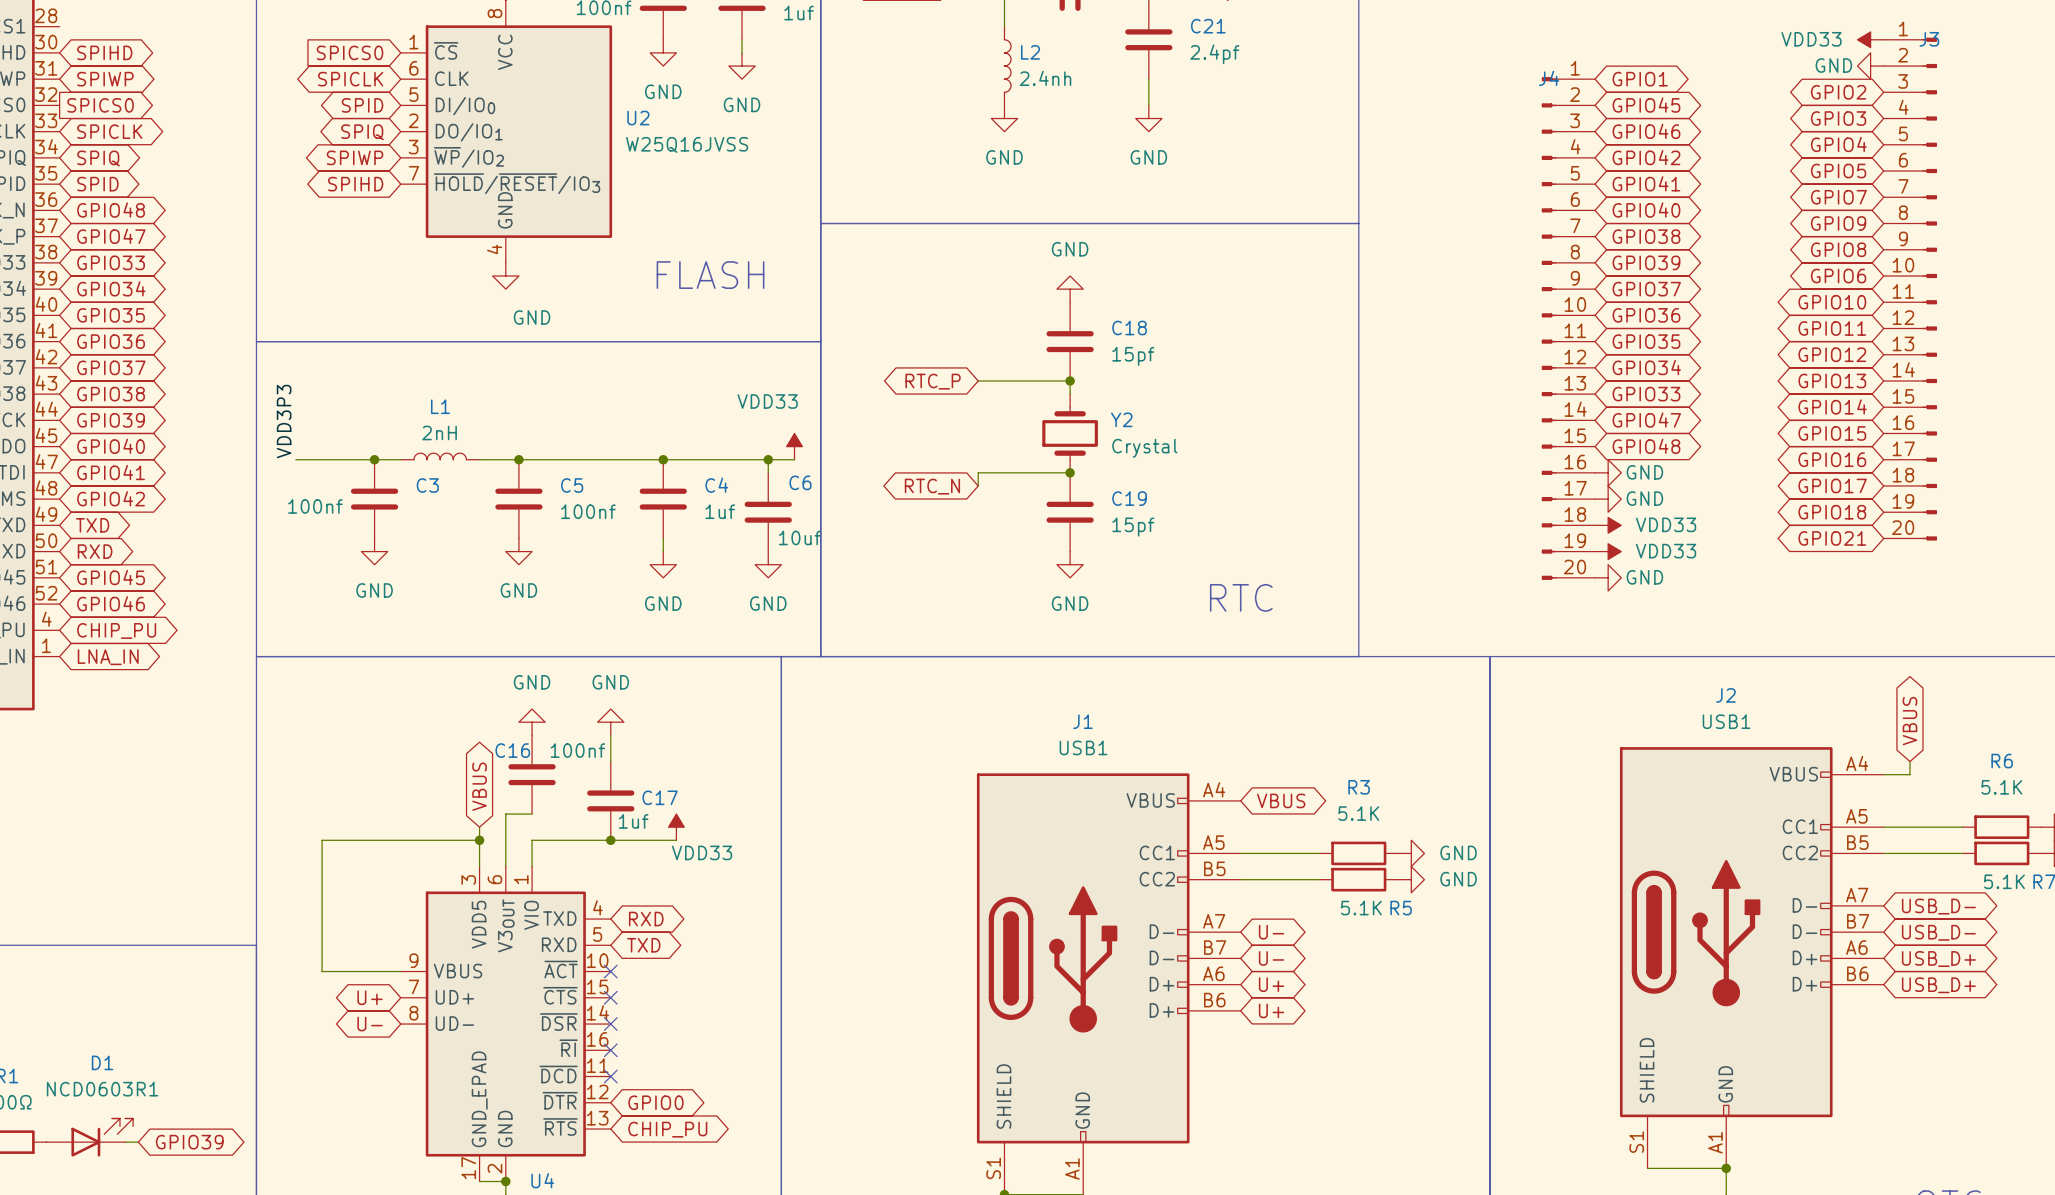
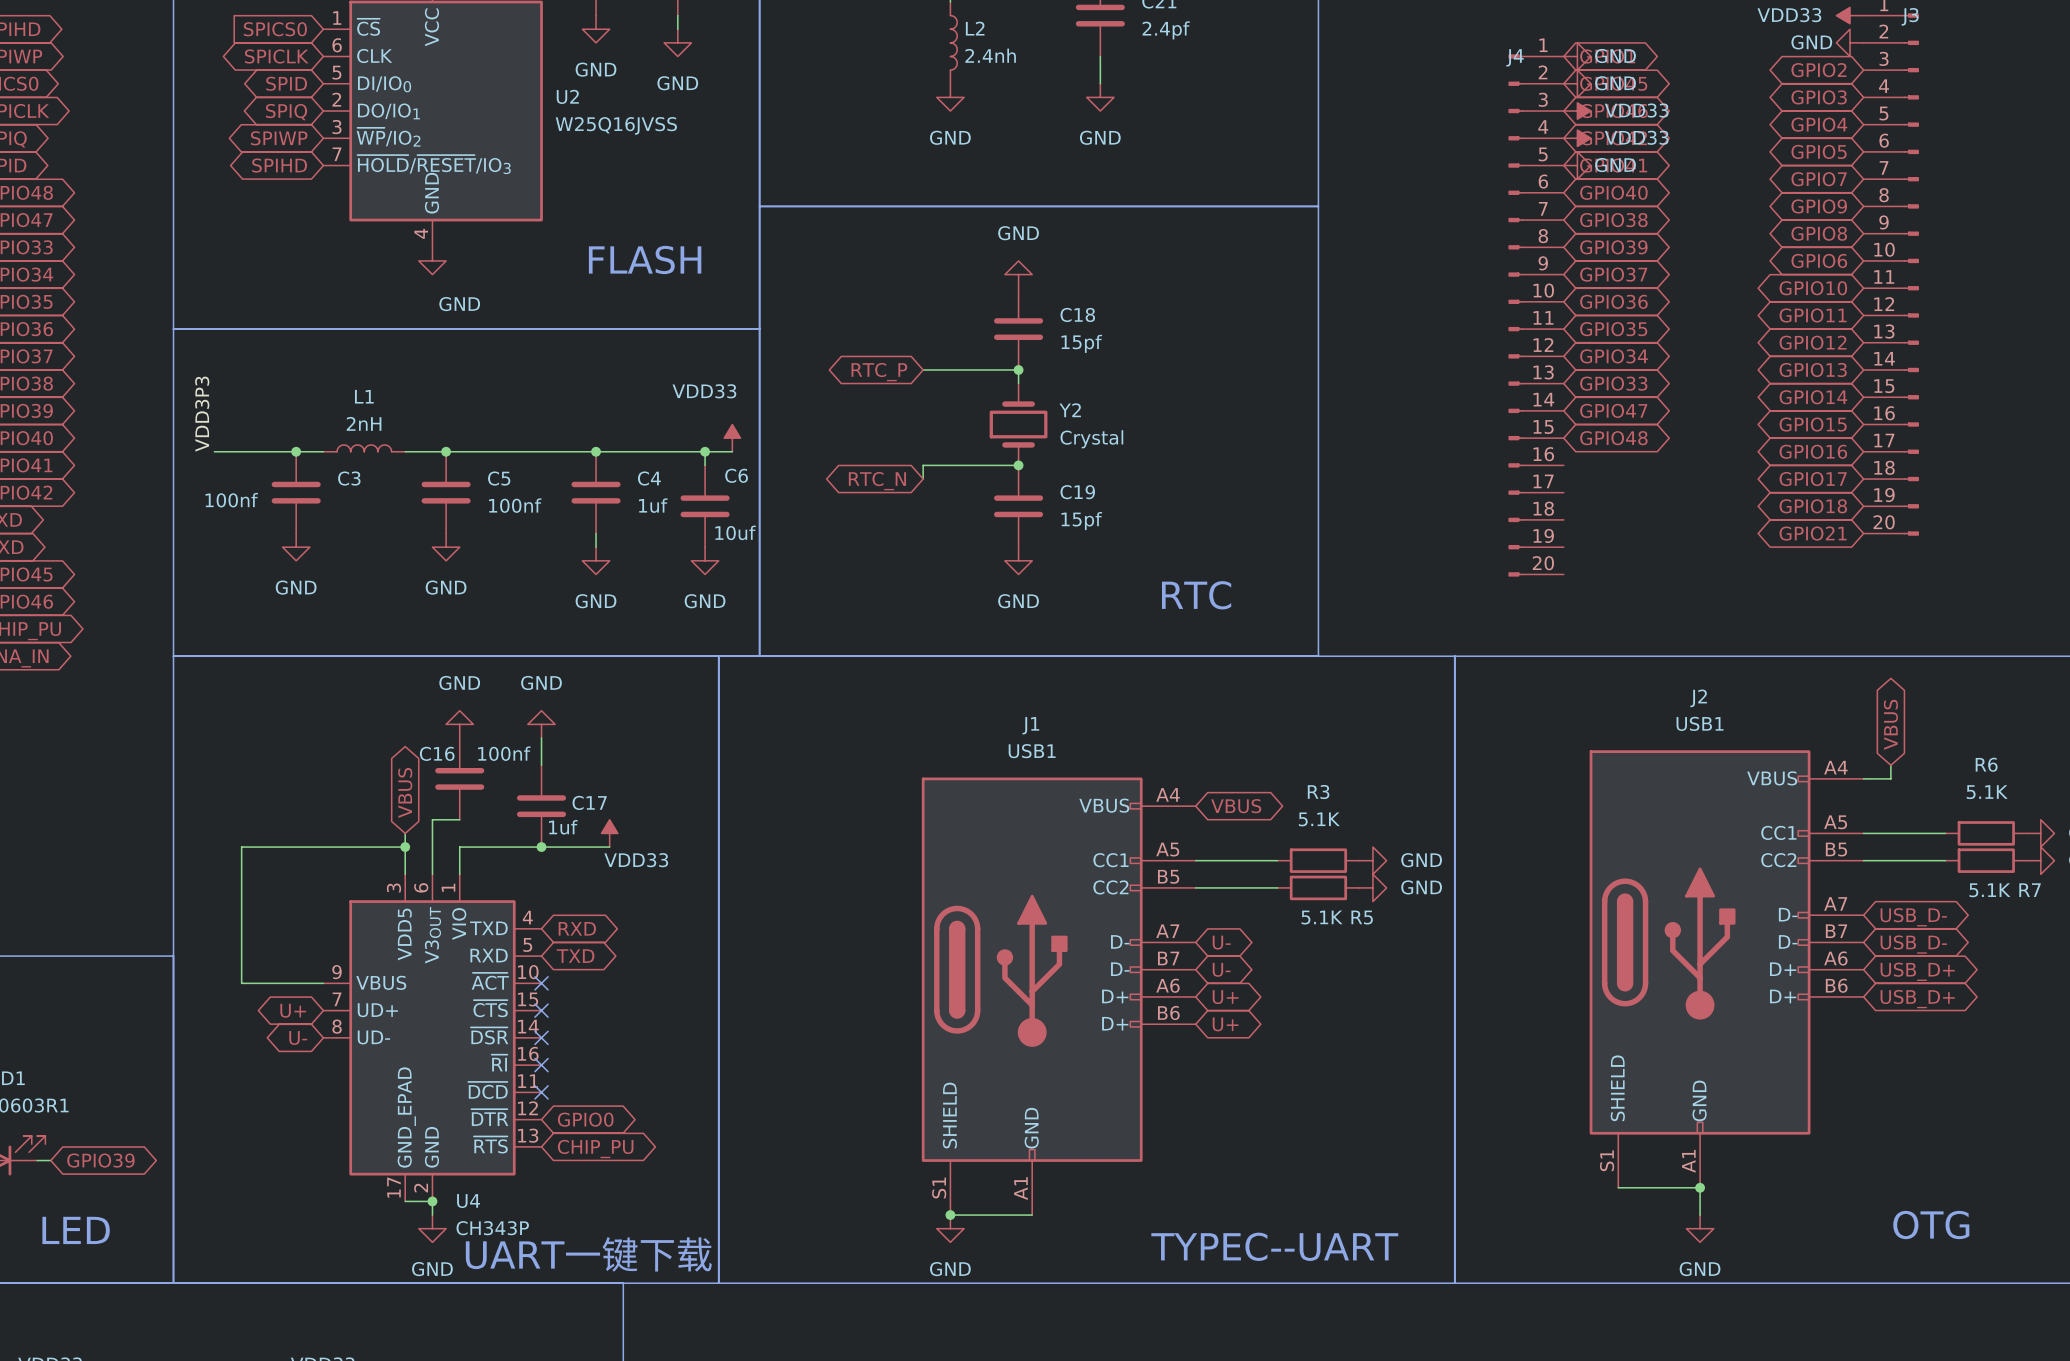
power symbol: none -> GND (1577, 56)
power symbol: none -> GND (1577, 83)
power symbol: none -> VDD33 (1577, 111)
power symbol: none -> VDD33 (1577, 138)
power symbol: none -> GND (1577, 165)
power symbol: GND (1608, 472) -> none
power symbol: GND (1608, 499) -> none
power symbol: VDD33 (1608, 525) -> none
power symbol: VDD33 (1608, 551) -> none
power symbol: GND (1608, 577) -> none

